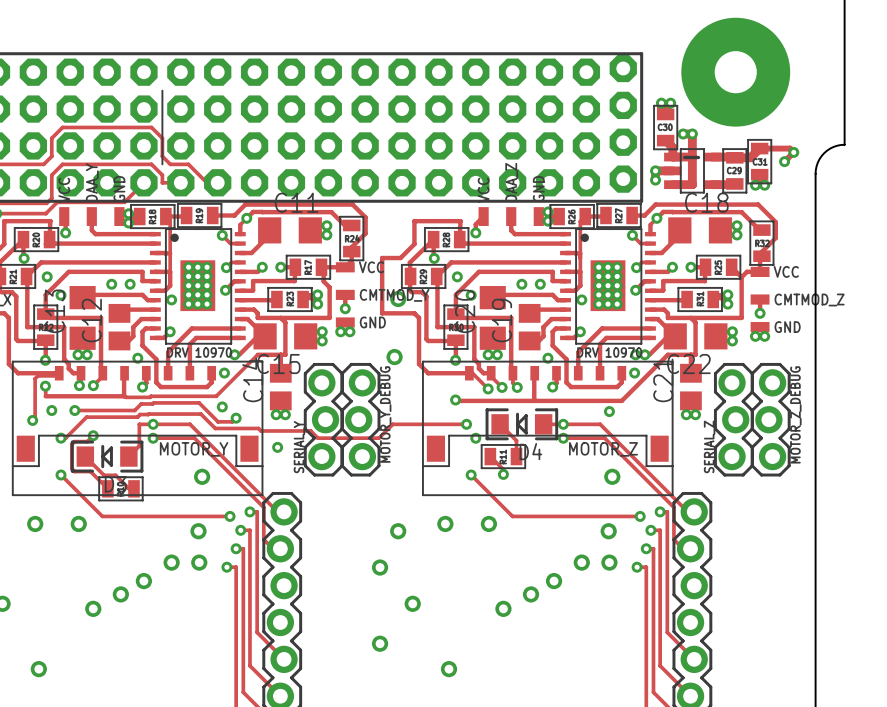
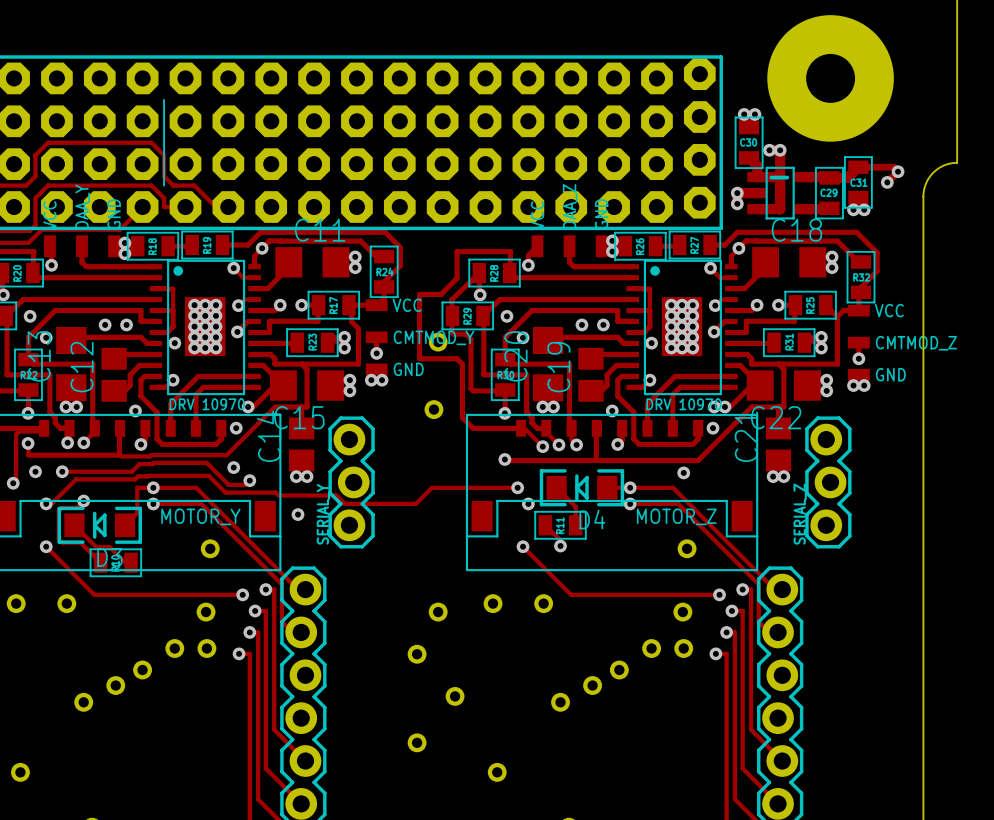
track: (165, 216) (170, 220) (170, 253) -> none
track: (585, 216) (580, 221) (580, 253) -> none
MOTOR_Y_DEBUG: (360, 419) -> none
MOTOR_Z_DEBUG: (770, 419) -> none

